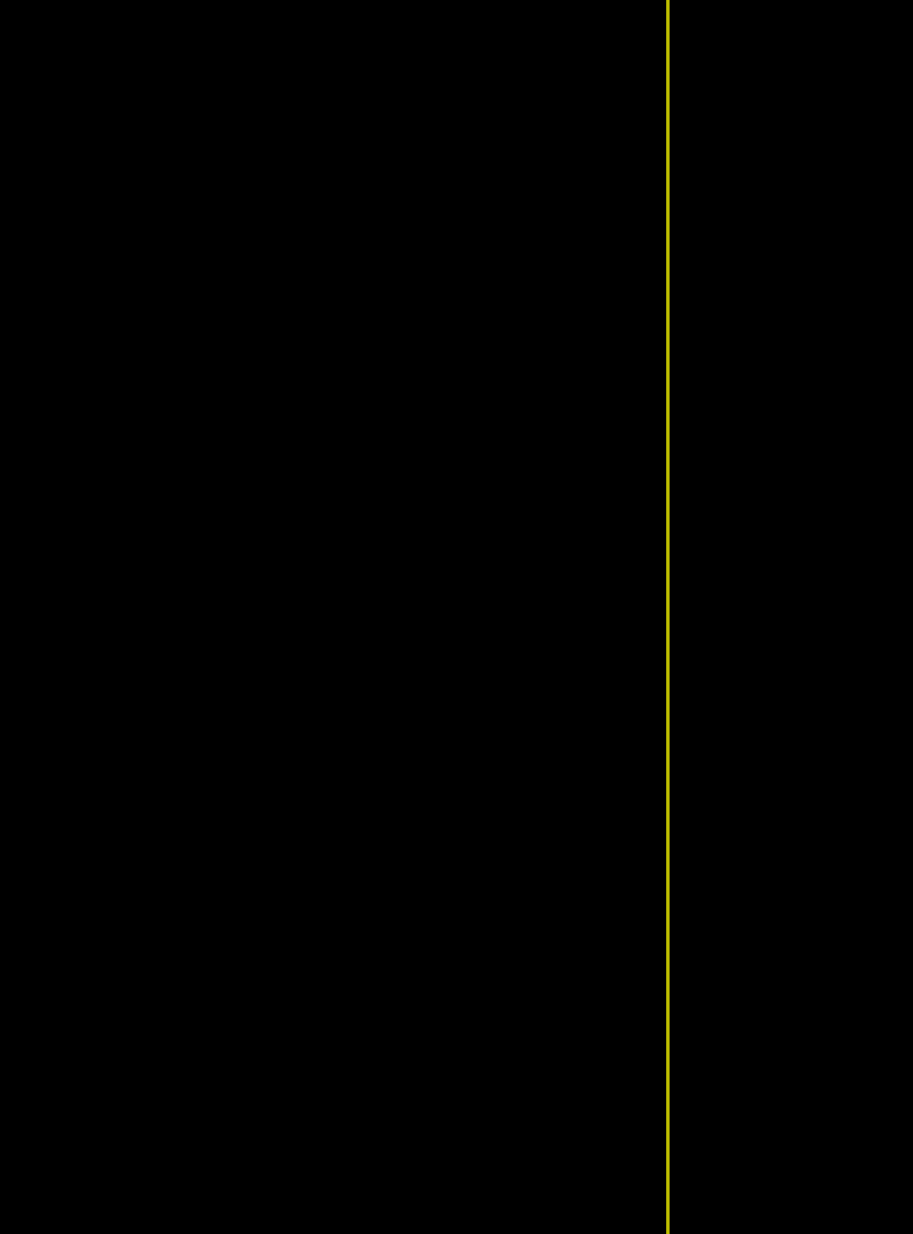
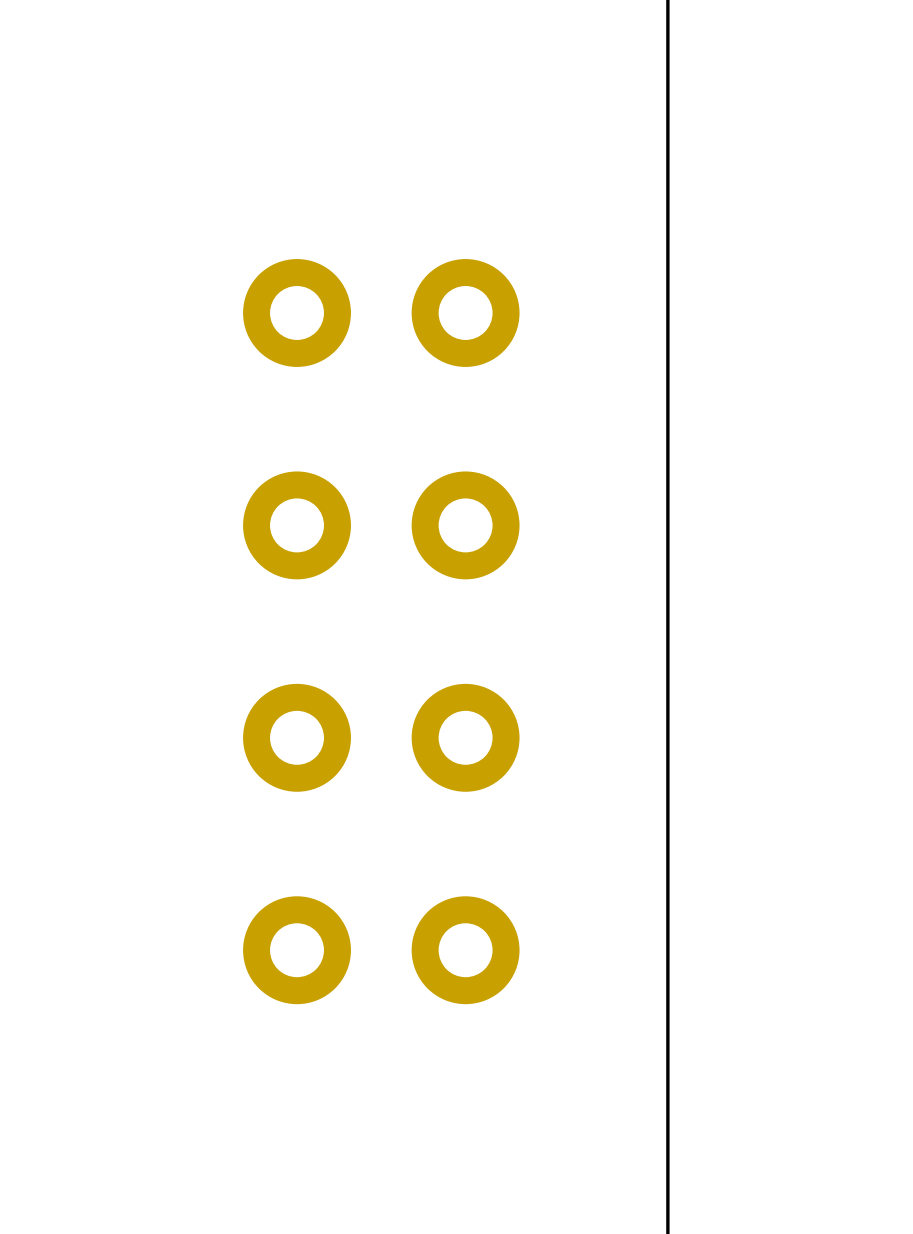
part: none -> (381, 312)
part: none -> (381, 525)
part: none -> (381, 737)
part: none -> (381, 950)

